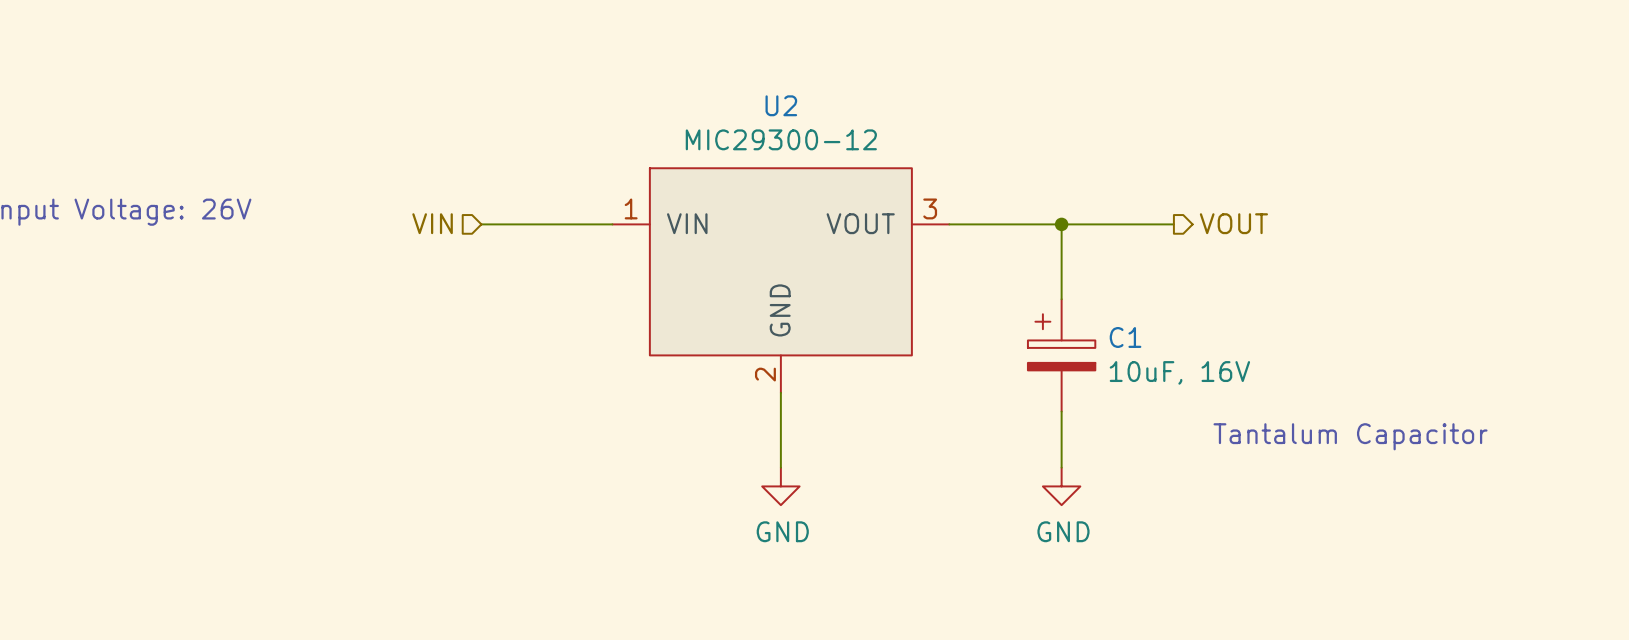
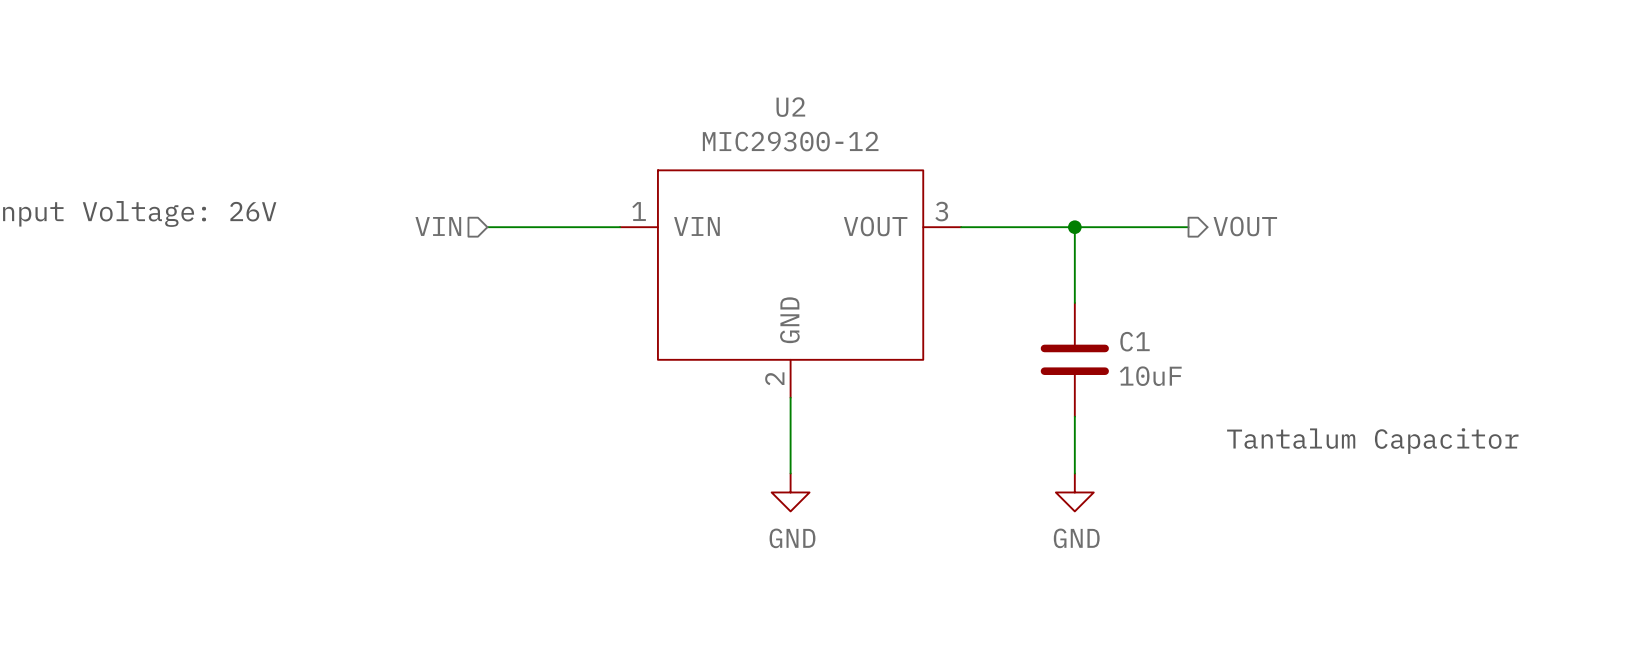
C1 symbol: [1027, 299, 1096, 412] -> [1040, 302, 1109, 417]
C1 value: 10uF, 16V (1179, 372) -> 10uF (1150, 376)

